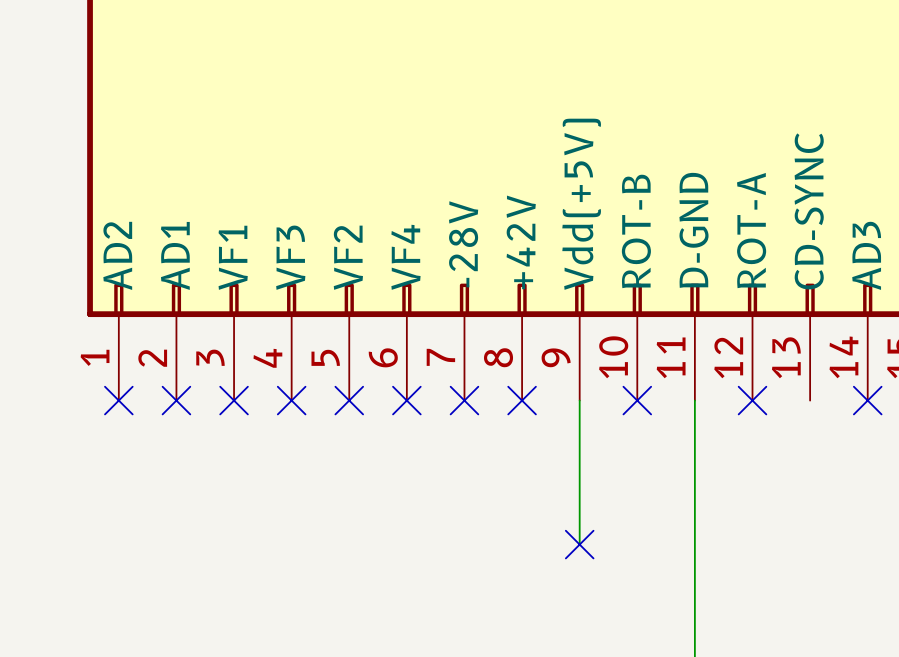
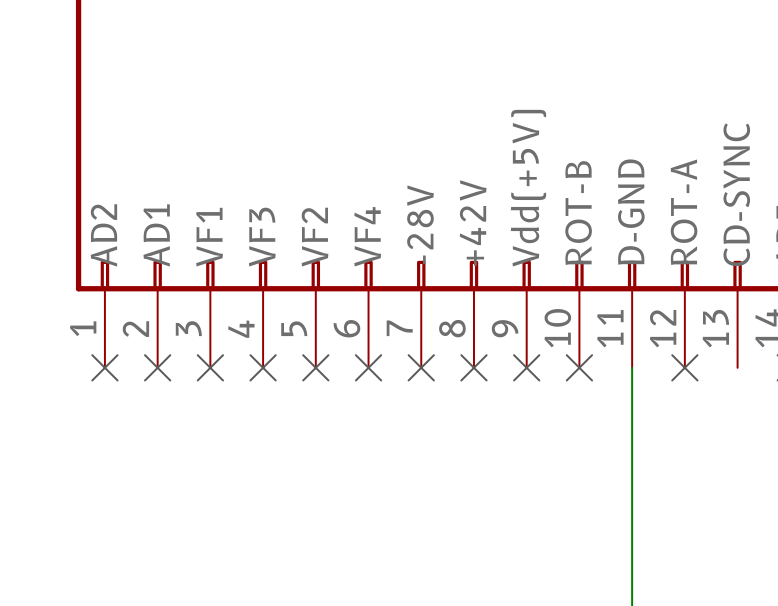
wire: (579, 400) (579, 544) -> none
no-connect mark: none -> (526, 367)
no-connect mark: (579, 544) -> none

